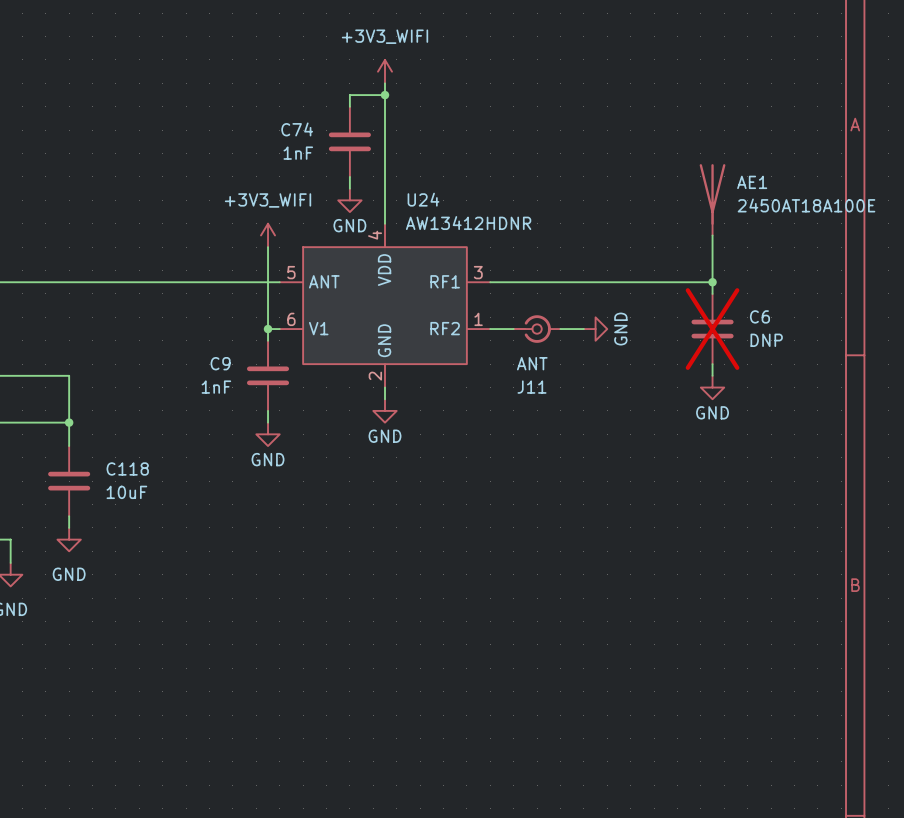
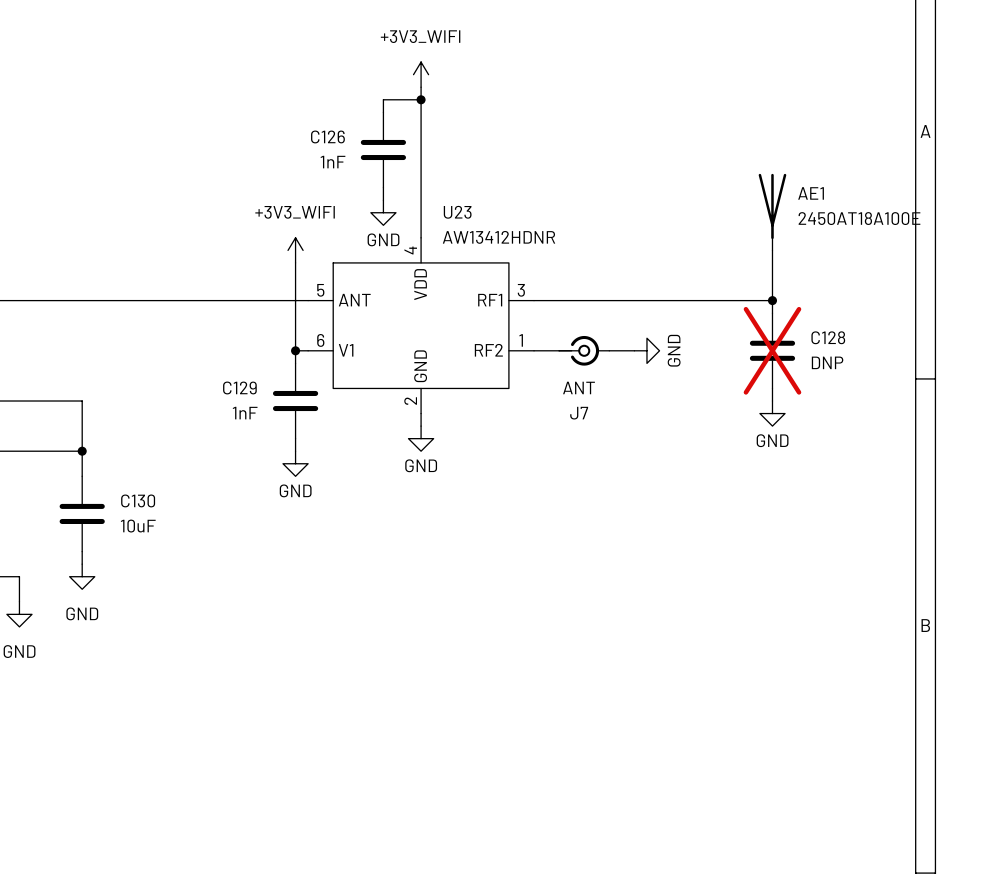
C74 name: C74 (297, 129) -> C126 (327, 136)
U24 name: U24 (423, 199) -> U23 (457, 212)
C6 name: C6 (759, 316) -> C128 (828, 337)
C9 name: C9 (220, 363) -> C129 (239, 387)
J11 name: J11 (532, 387) -> J7 (579, 413)
C118 name: C118 (127, 468) -> C130 (138, 500)

